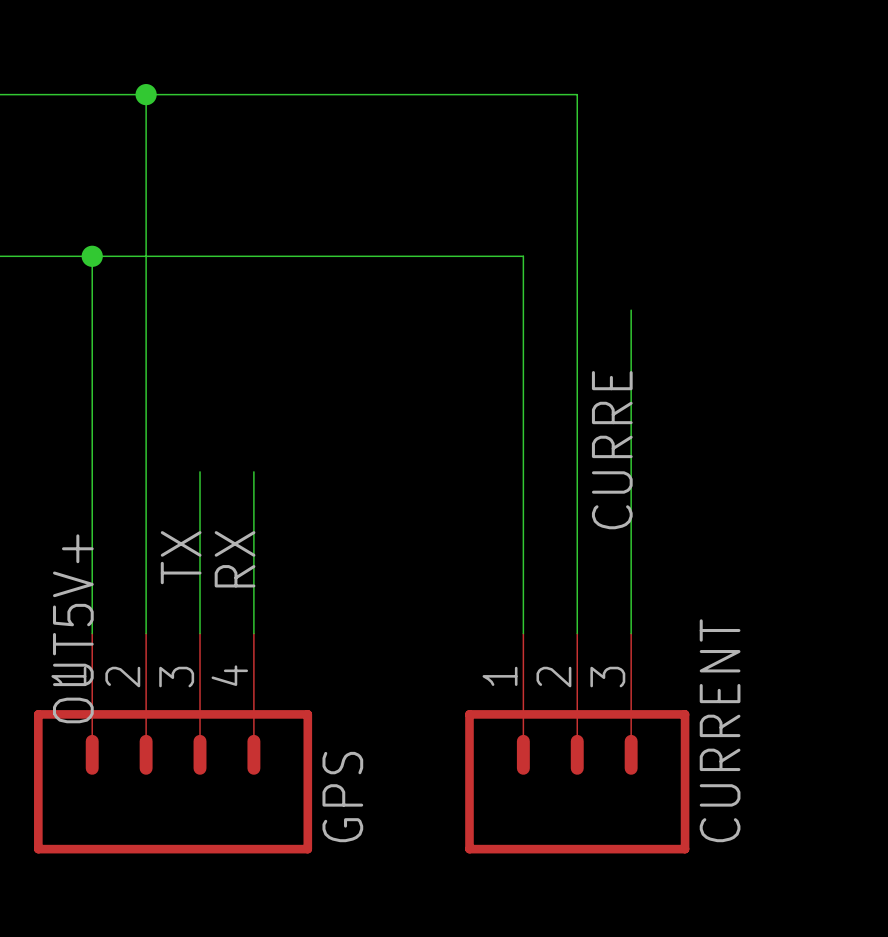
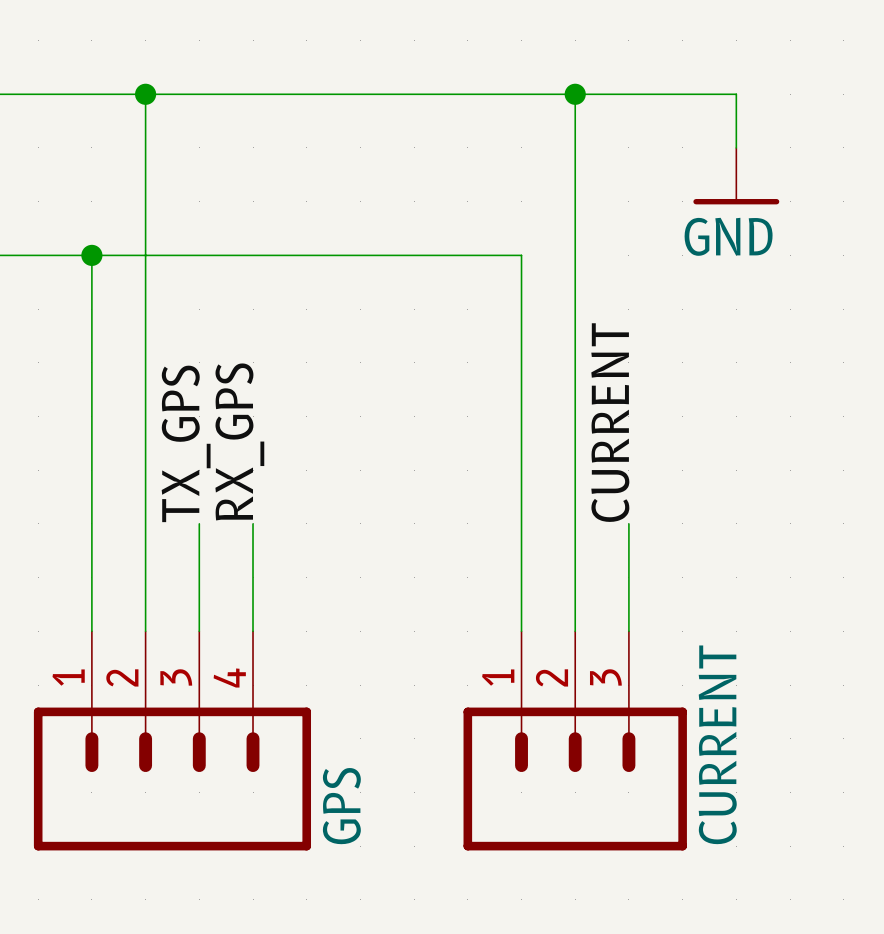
wire: none -> (575, 94) (736, 94) (736, 147)
junction: none -> (575, 94)
power symbol: none -> GND (736, 176)
wire: (631, 310) (631, 525) -> none
label: CURRE (612, 450) -> CURRENT (610, 422)
wire: (200, 471) (200, 525) -> none
wire: (253, 471) (253, 525) -> none
label: TX (181, 557) -> TX_GPS (186, 443)
label: RX (235, 559) -> RX_GPS (239, 441)
label: OUT5V+ (73, 628) -> none

